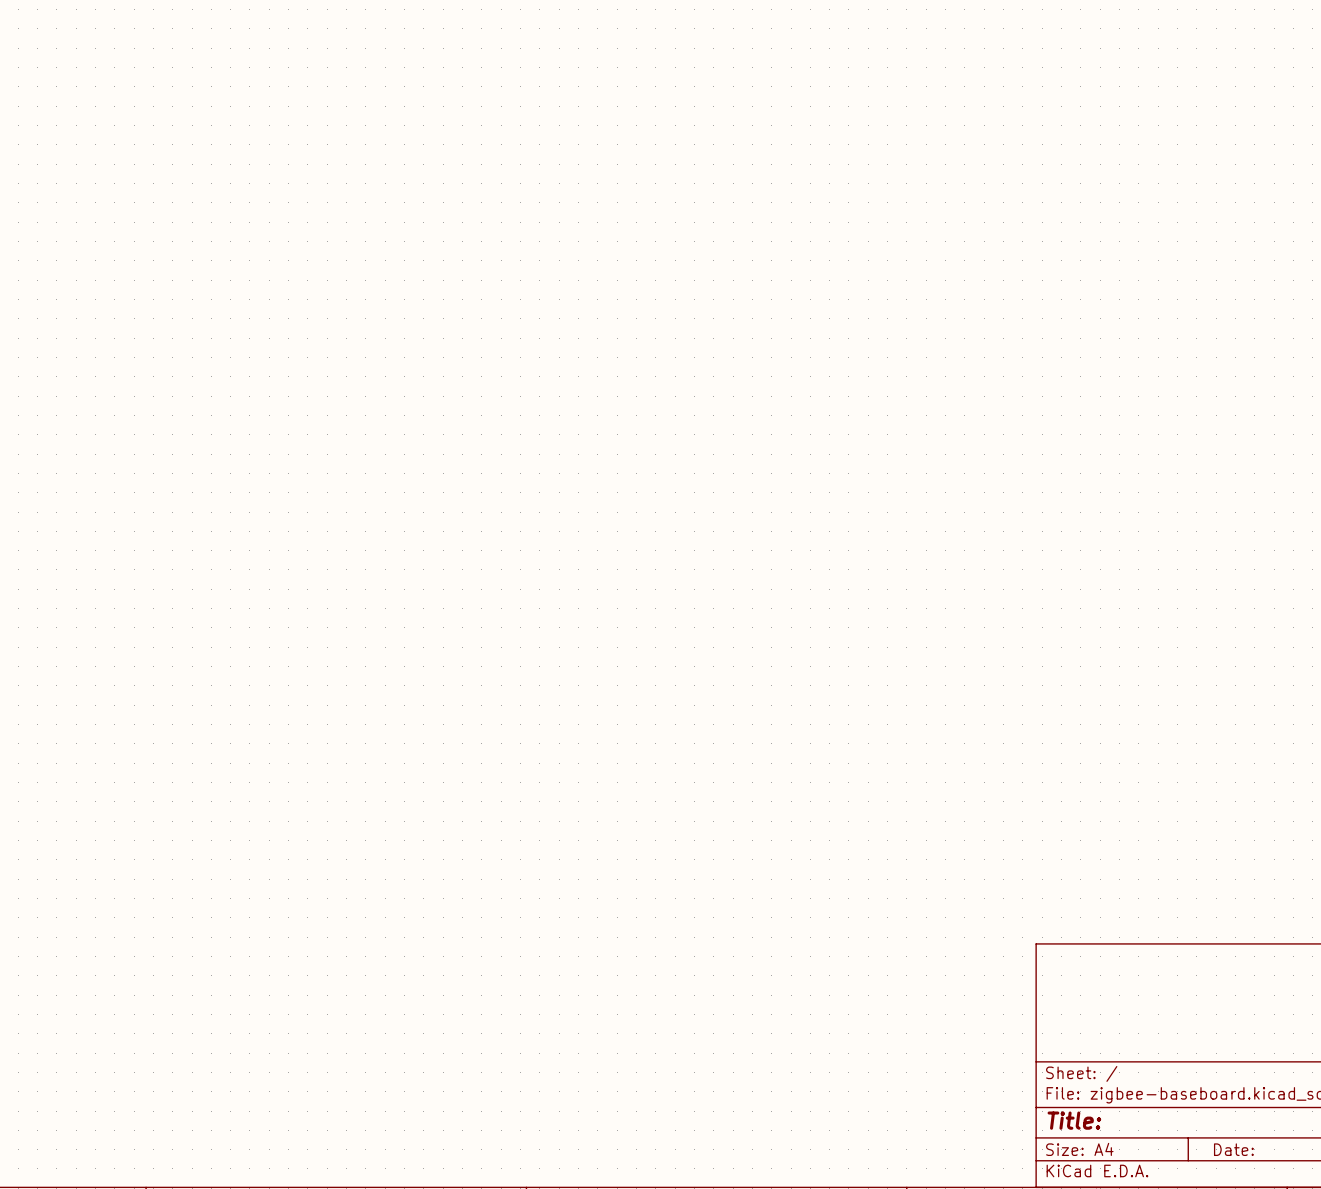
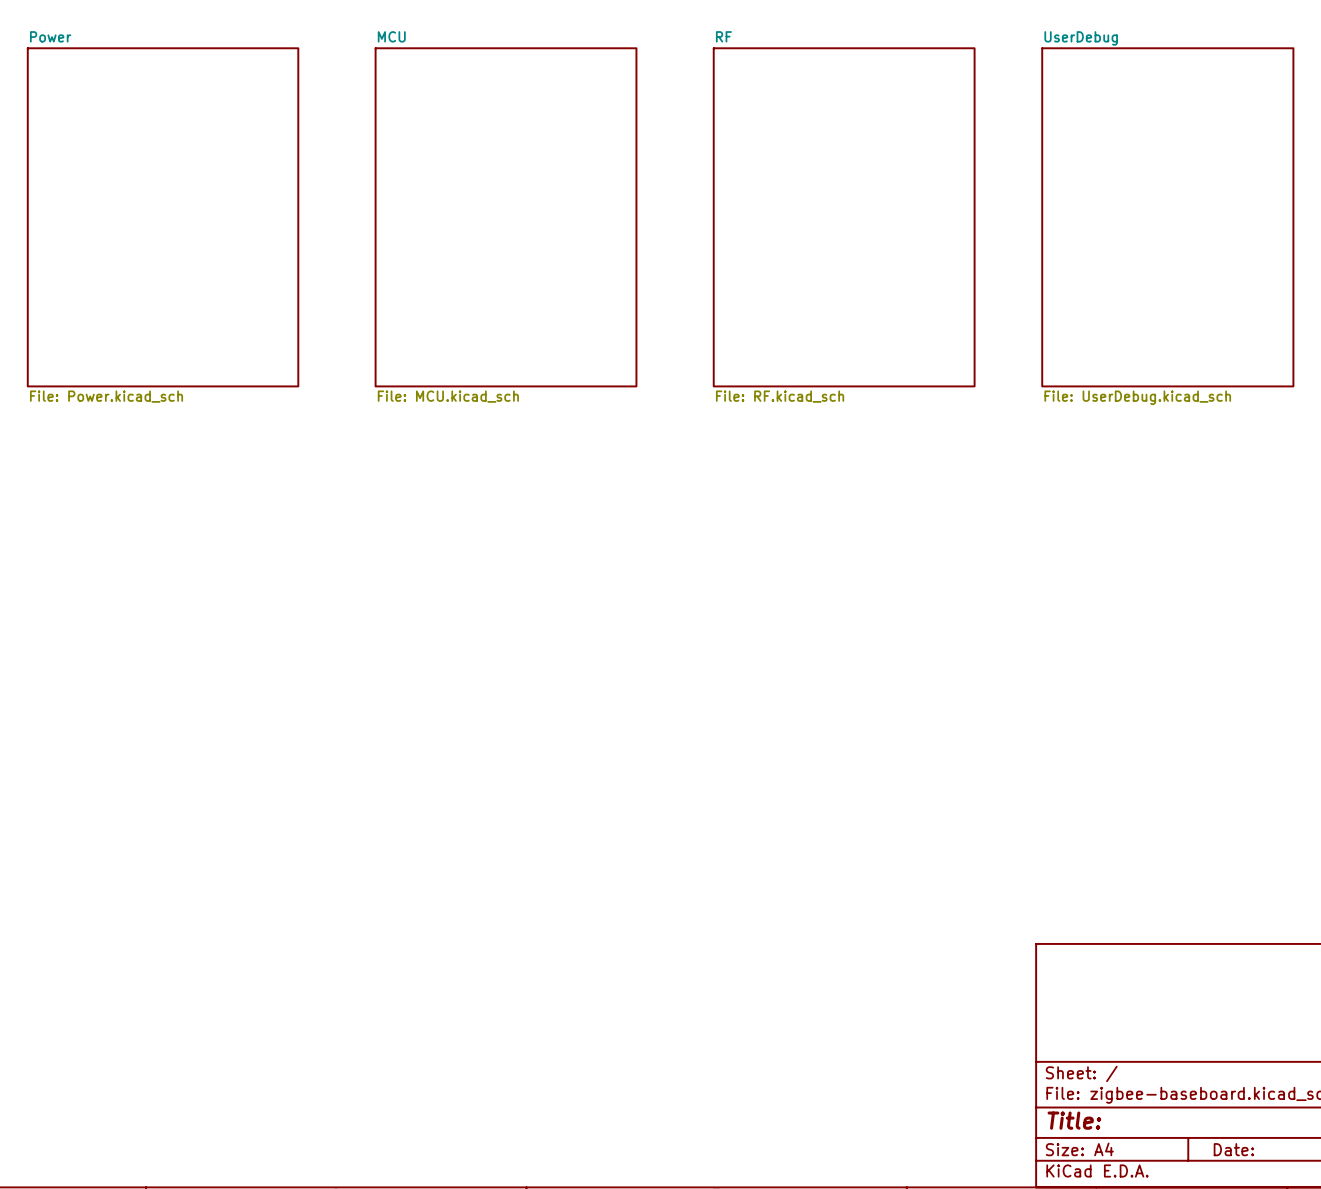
sheet Power: none -> File: Power.kicad_sch (163, 217)
sheet MCU: none -> File: MCU.kicad_sch (506, 217)
sheet RF: none -> File: RF.kicad_sch (844, 217)
sheet UserDebug: none -> File: UserDebug.kicad_sch (1167, 217)

